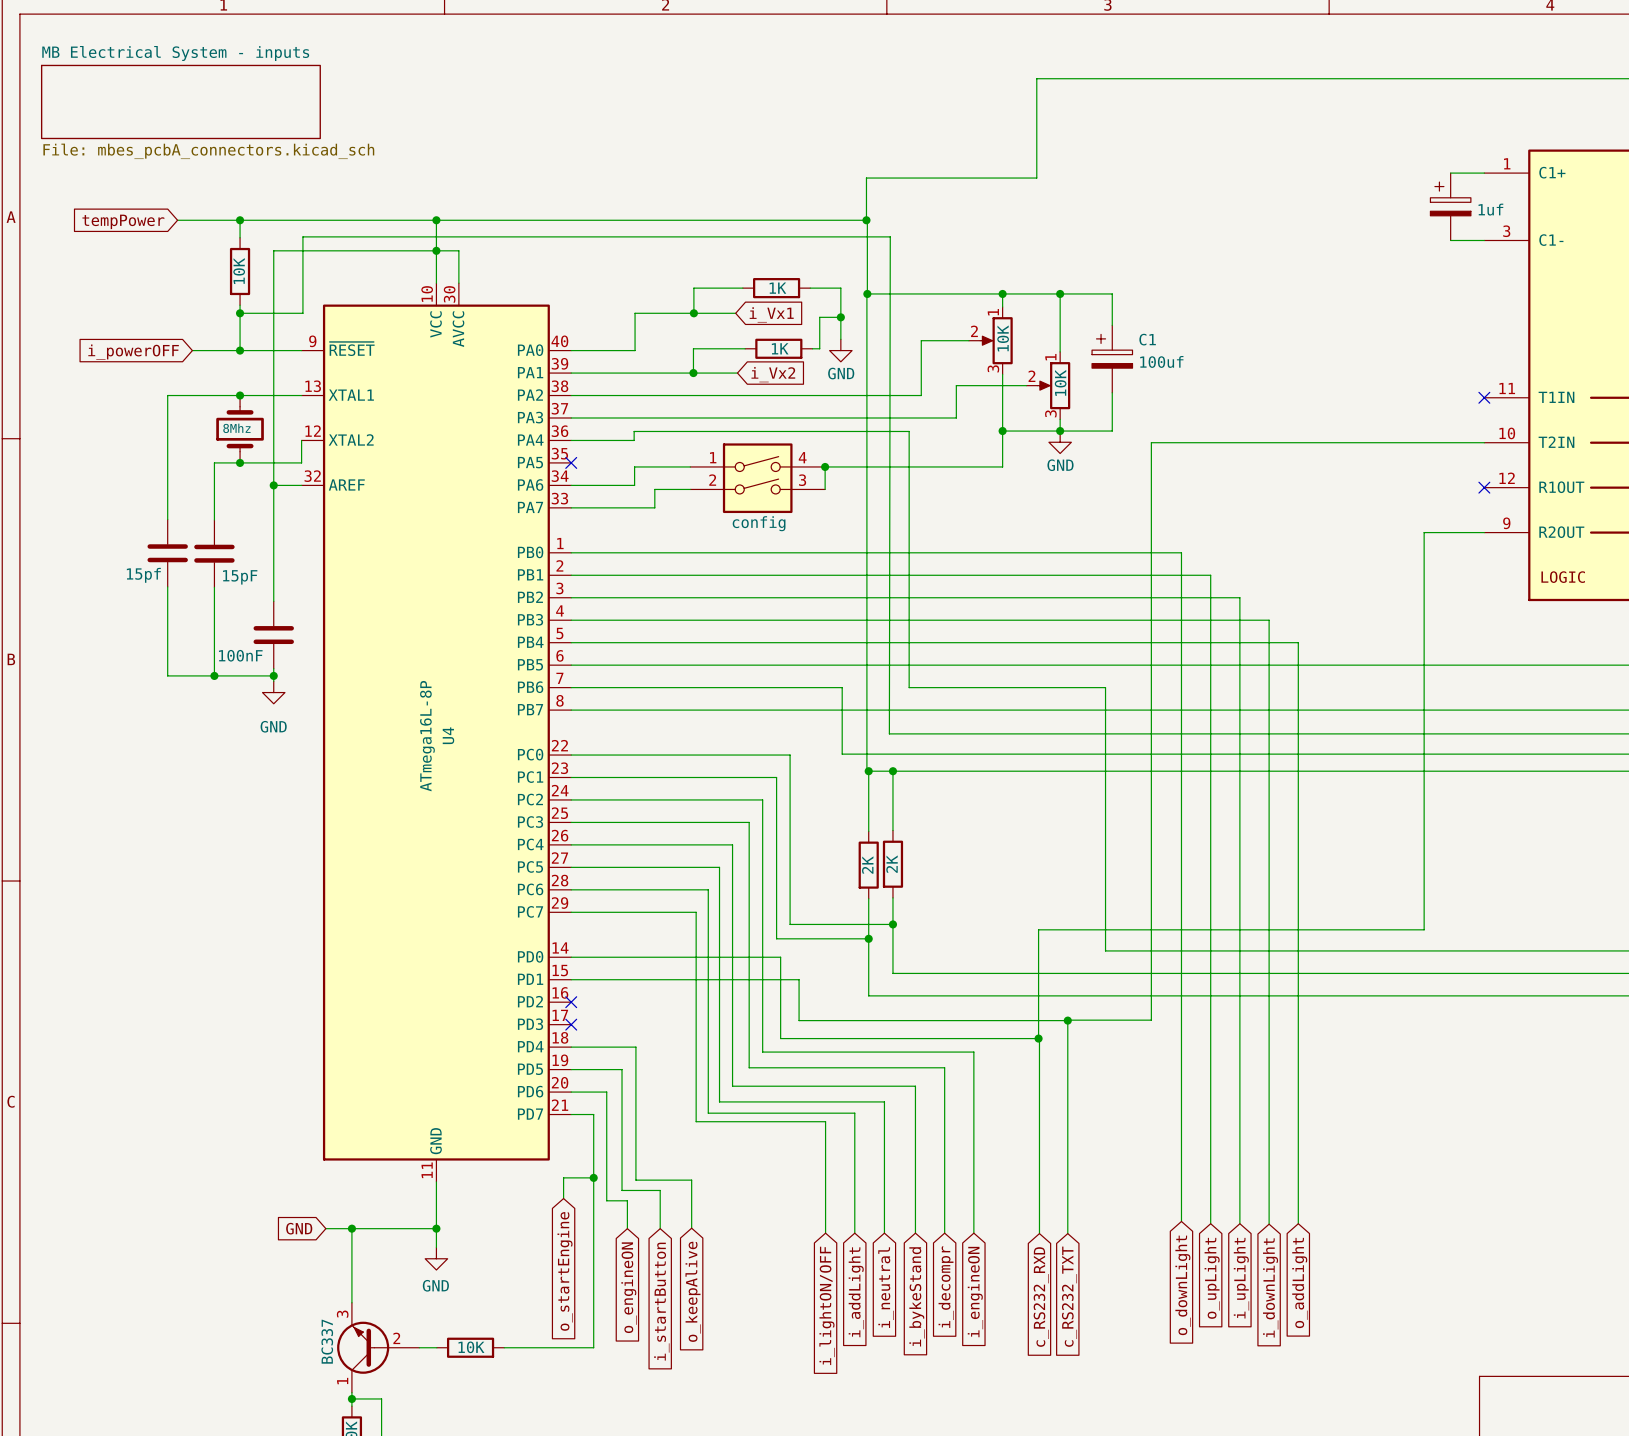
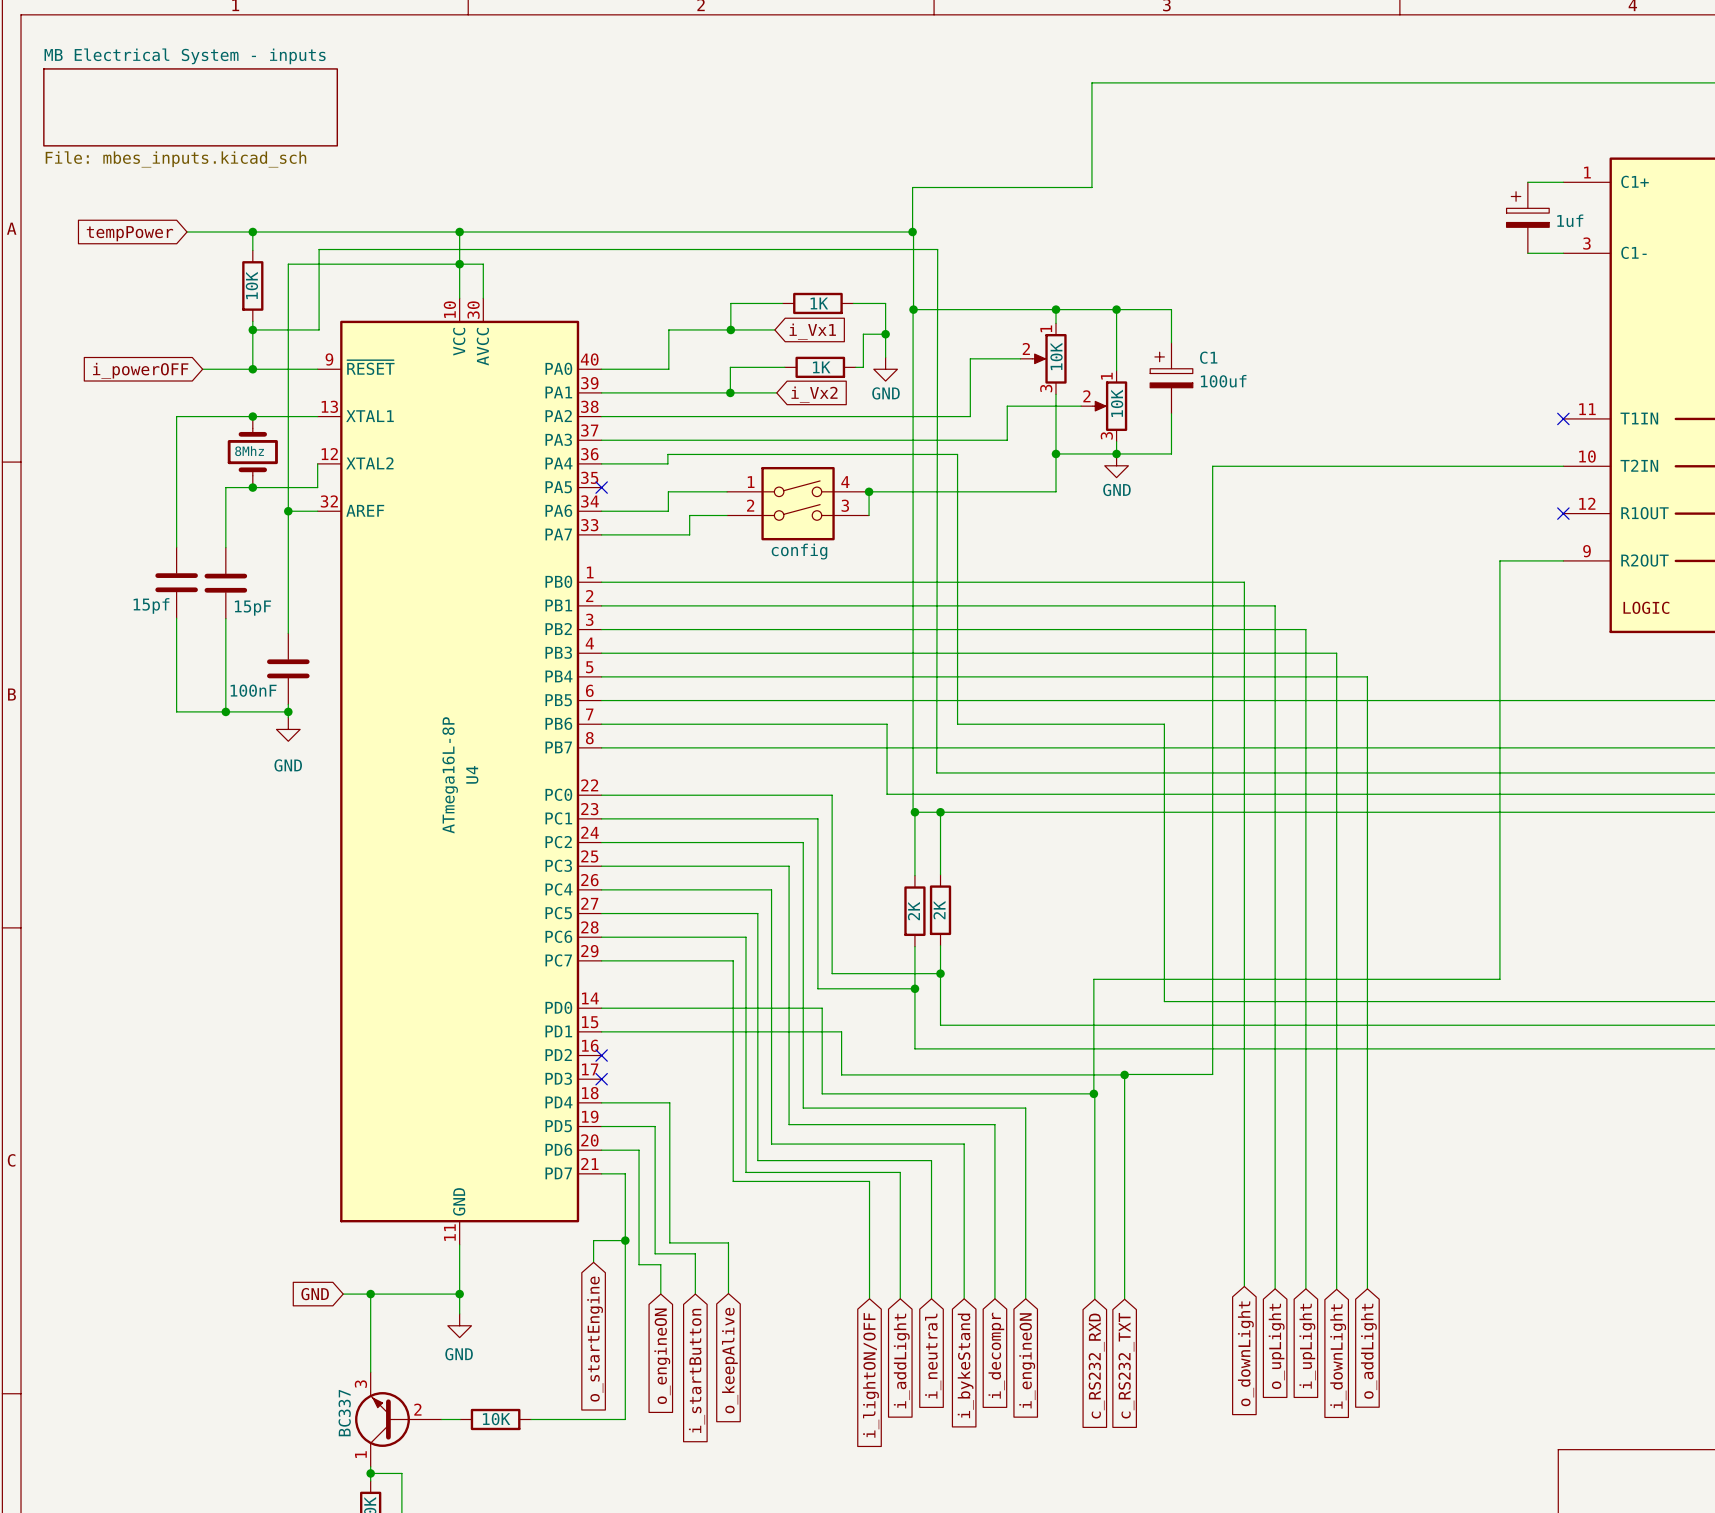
sheet MB Electrical System - inputs value: File: mbes_pcbA_connectors.kicad_sch (208, 151) -> File: mbes_inputs.kicad_sch (175, 159)

